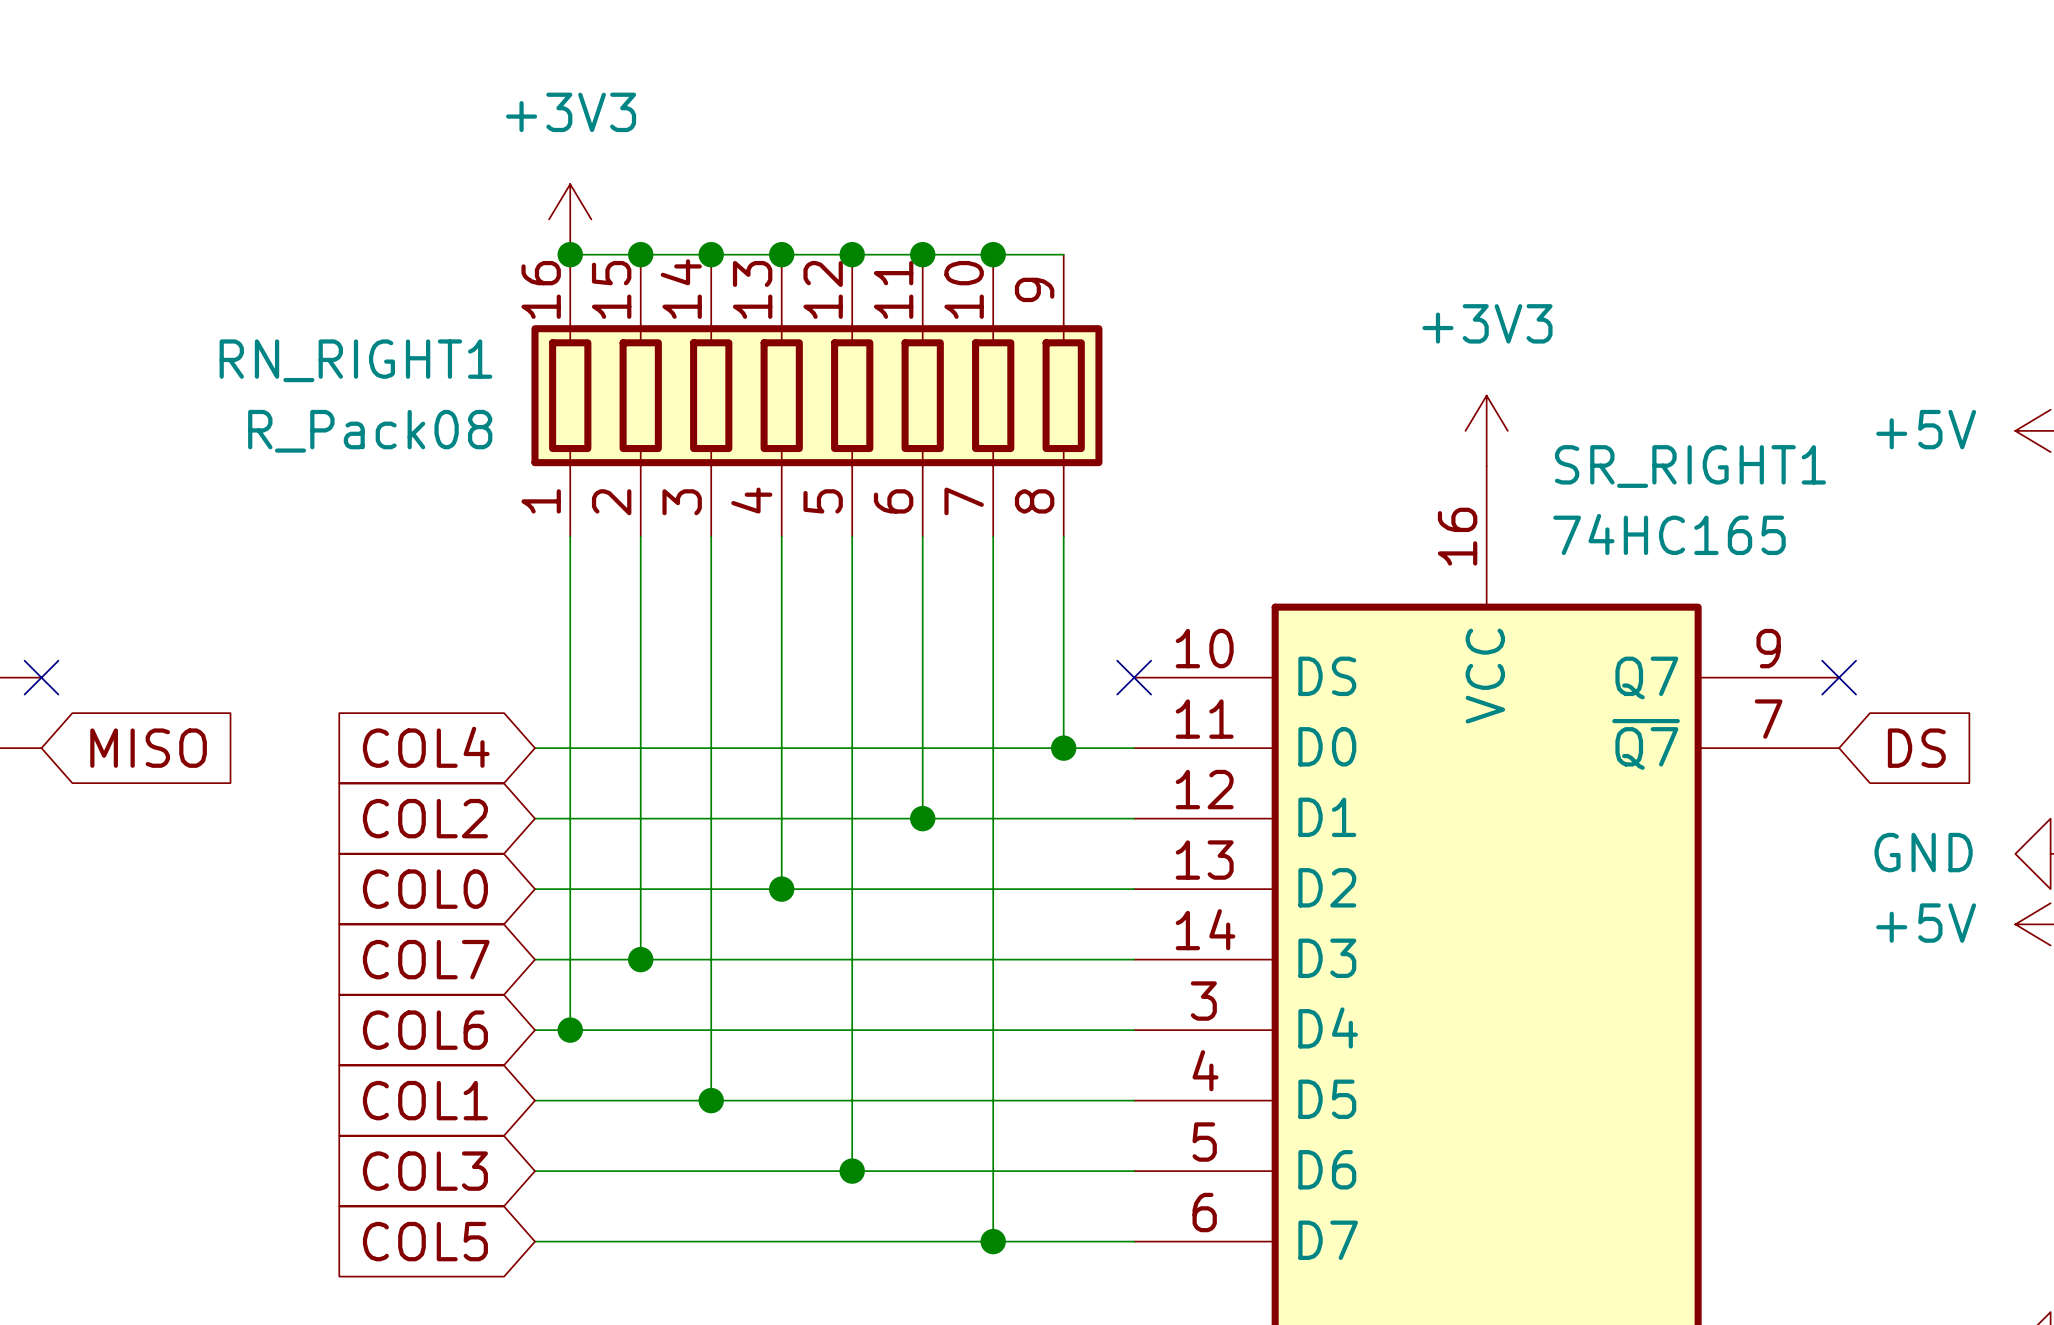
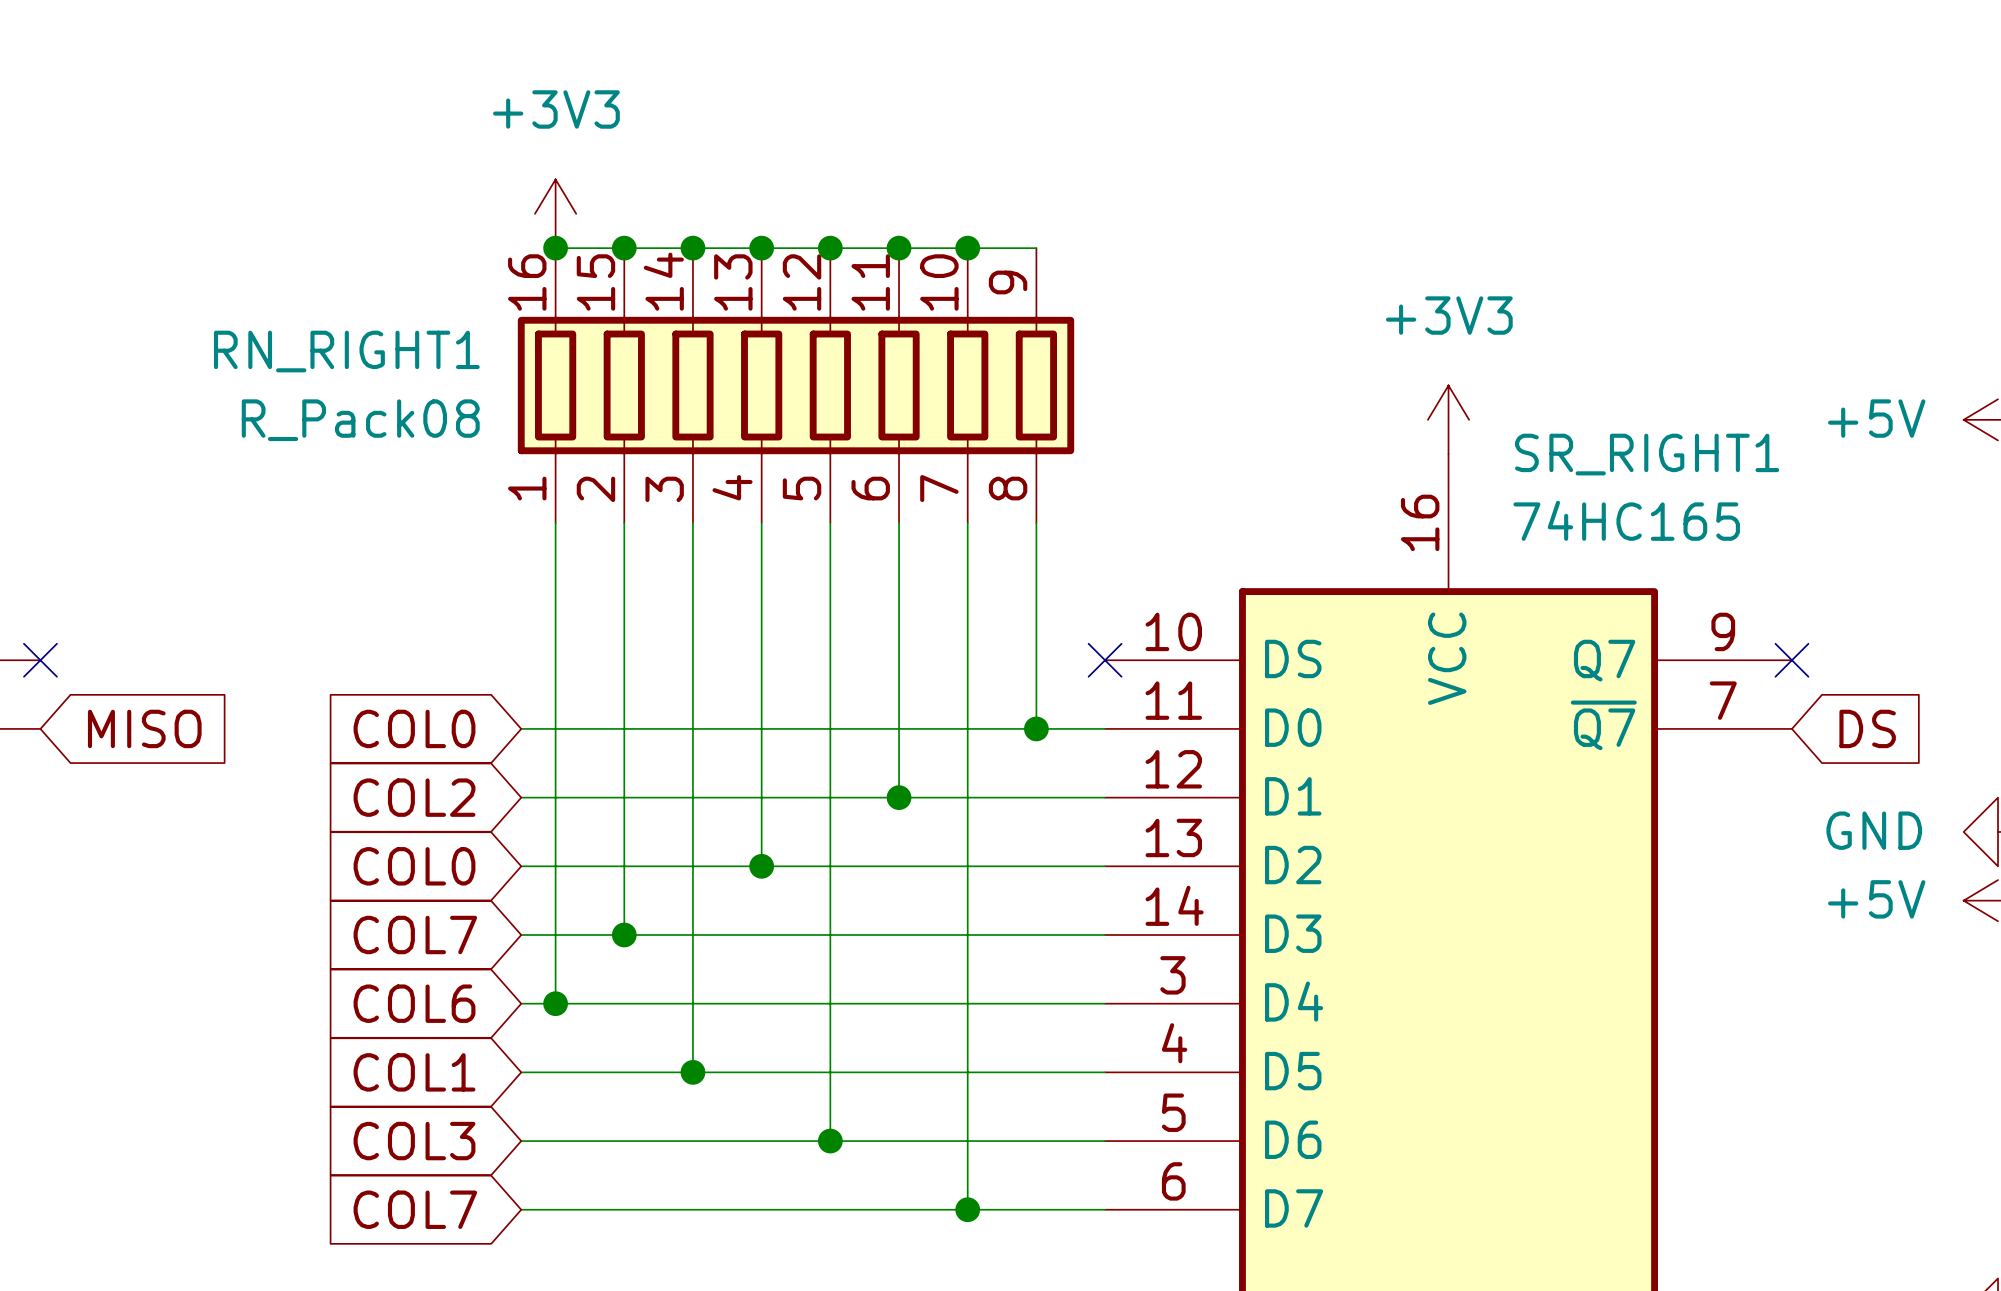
global label: COL4 (426, 747) -> COL0 (414, 728)
global label: COL5 (425, 1241) -> COL7 (415, 1209)

